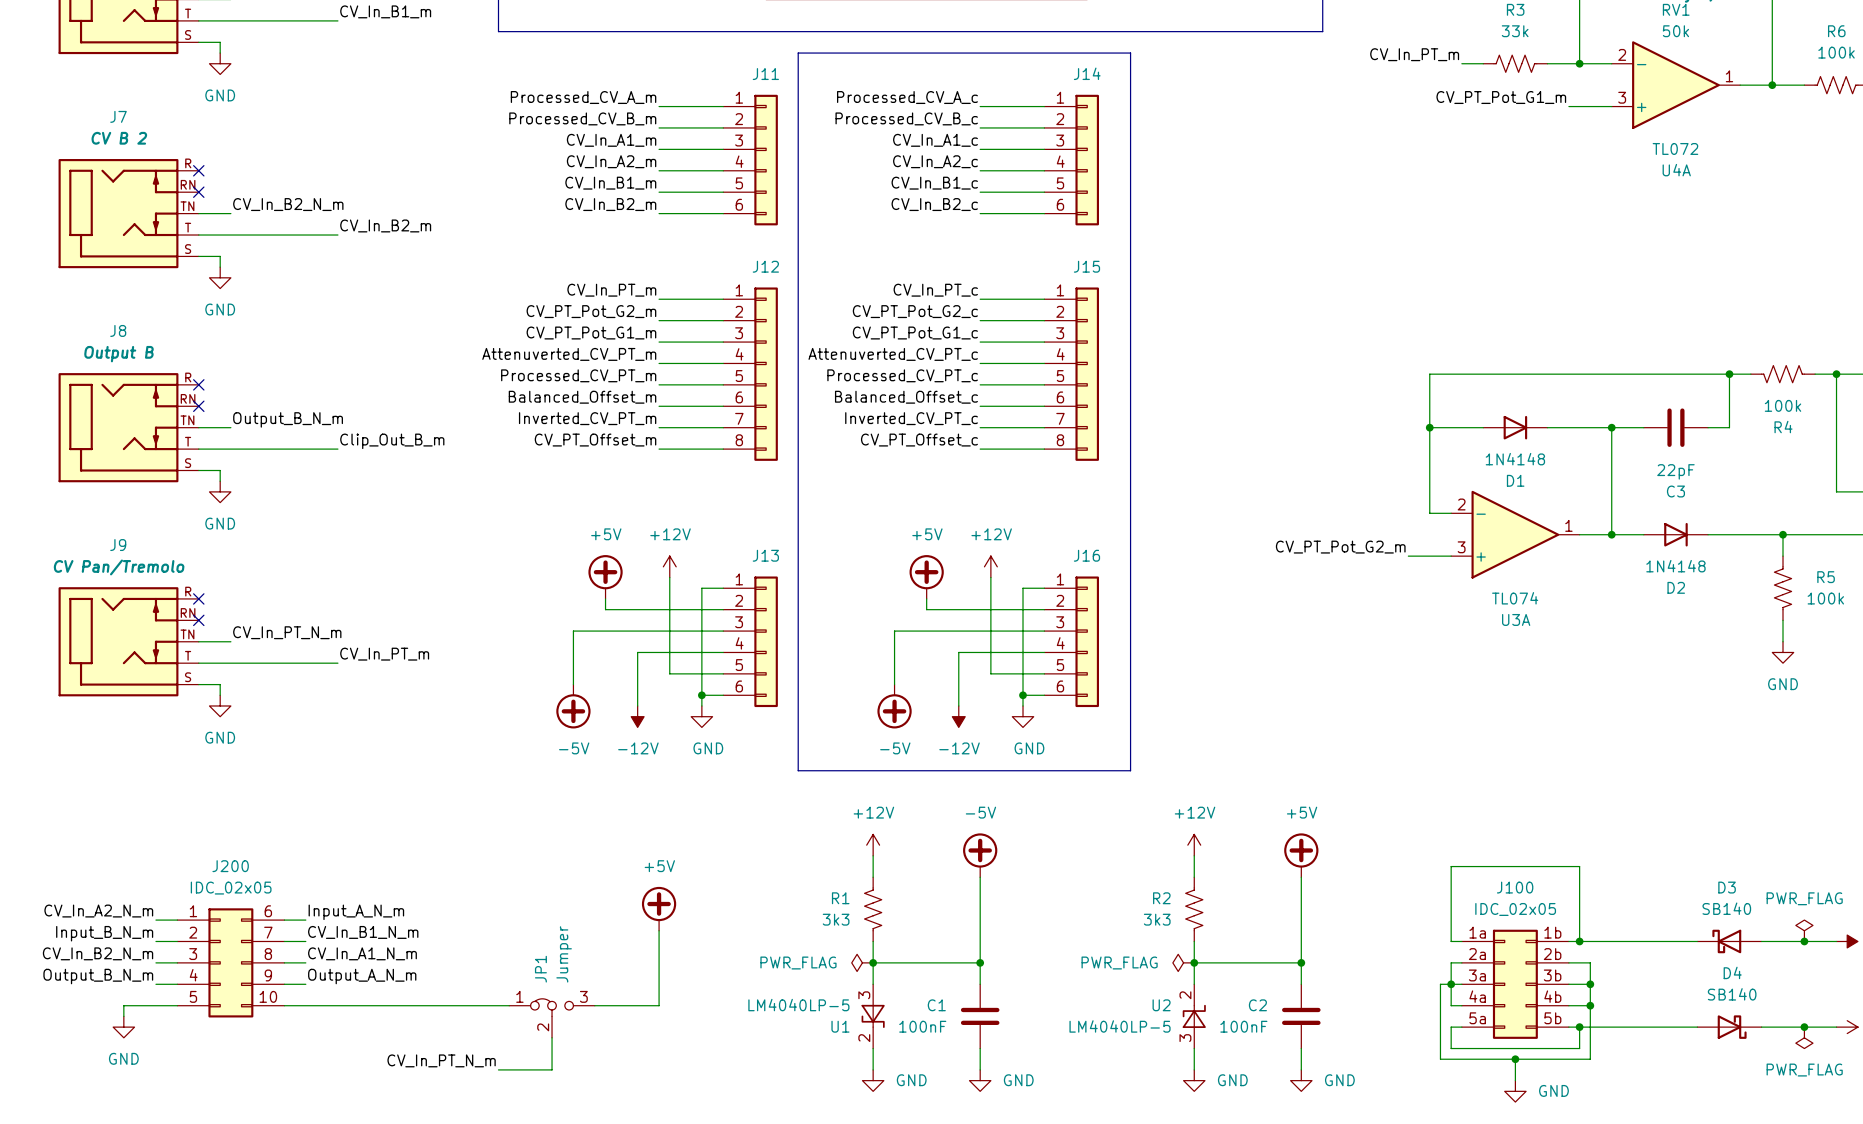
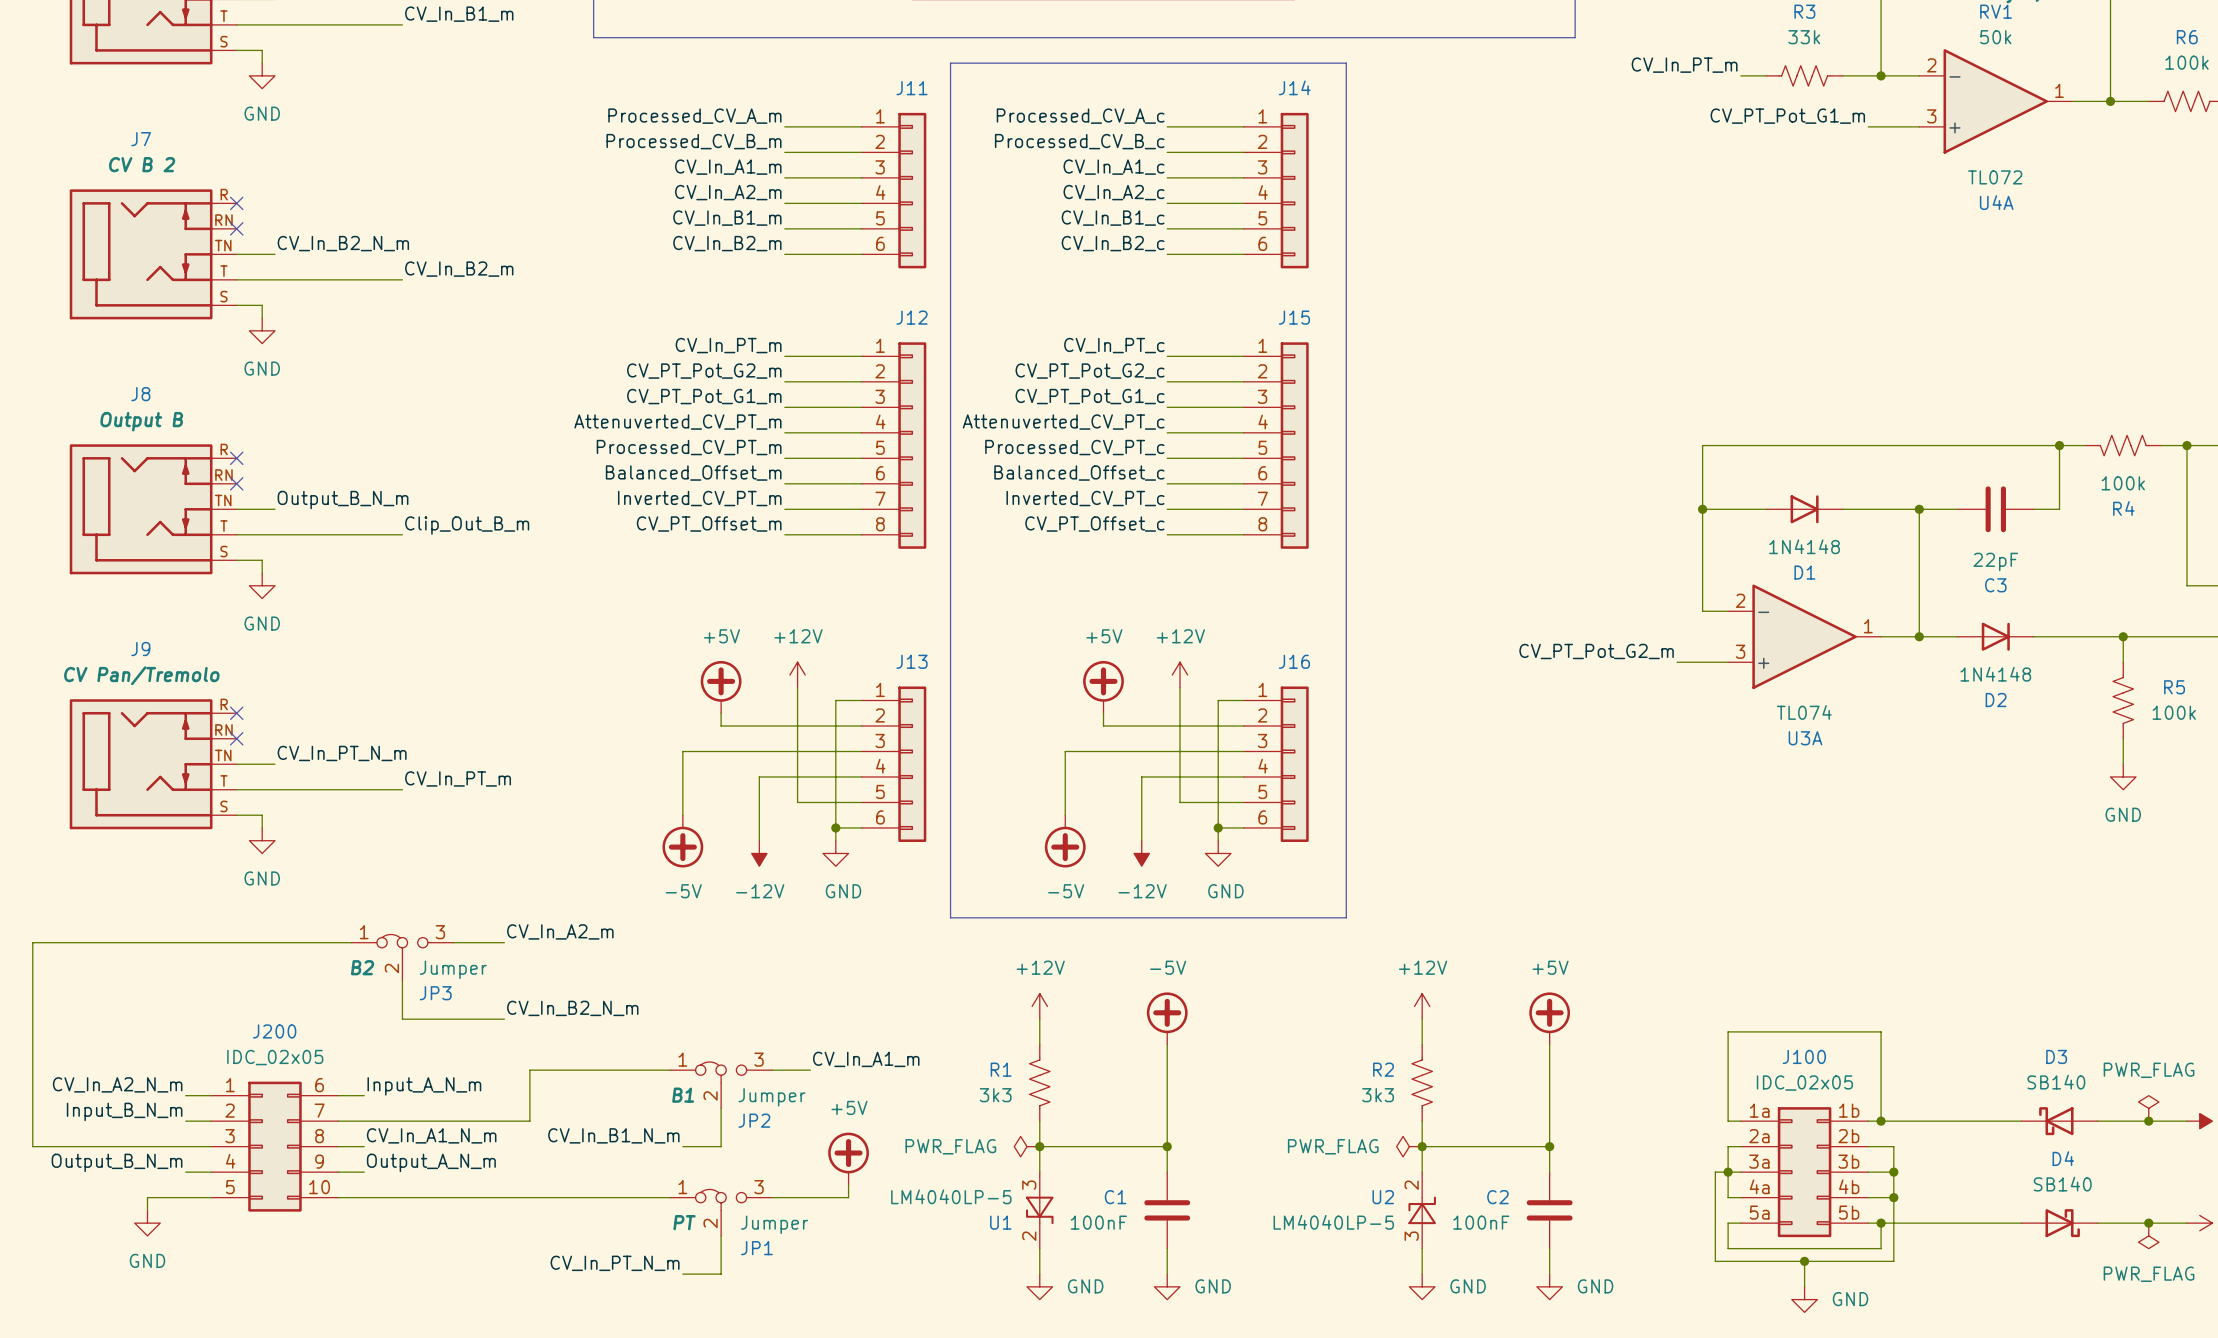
label: none -> CV_In_A2_m (560, 931)
wire: none -> (351, 942) (32, 942) (32, 1146) (185, 1146)
wire: none -> (453, 942) (504, 942)
JP3: none -> Jumper (402, 957)
wire: none -> (402, 980) (402, 1019) (504, 1019)
label: none -> CV_In_B2_N_m (572, 1008)
label: none -> CV_In_A1_m (866, 1059)
wire: none -> (670, 1070) (529, 1070) (529, 1121) (364, 1121)
wire: none -> (772, 1070) (810, 1070)
power symbol position: +5V (659, 908) -> +5V (848, 1158)
JP2: none -> Jumper (721, 1085)
wire: none -> (721, 1108) (721, 1146) (682, 1146)
wire: (659, 930) (659, 1005) -> (848, 1184) (848, 1197) (784, 1197)
label: CV_In_B1_N_m (363, 932) -> none
label: CV_In_B2_N_m (98, 953) -> none
label: none -> CV_In_B1_N_m (613, 1135)
JP1 value rotation: 0° (564, 954) -> 90° clockwise (774, 1224)
JP1 value position: Jumper (564, 954) -> Jumper (774, 1224)
JP1 name rotation: 0° (540, 969) -> 90° clockwise (756, 1248)
JP1 name position: JP1 (540, 969) -> JP1 (756, 1248)
wire: (594, 1005) (648, 1005) -> (606, 1197) (670, 1197)
JP1 position: (552, 1018) -> (721, 1212)
JP1 text: none -> PT (684, 1222)
wire: (552, 1037) (552, 1069) (498, 1069) -> none
wire: none -> (721, 1235) (721, 1274) (682, 1274)
label position: CV_In_PT_N_m (441, 1060) -> CV_In_PT_N_m (615, 1263)

